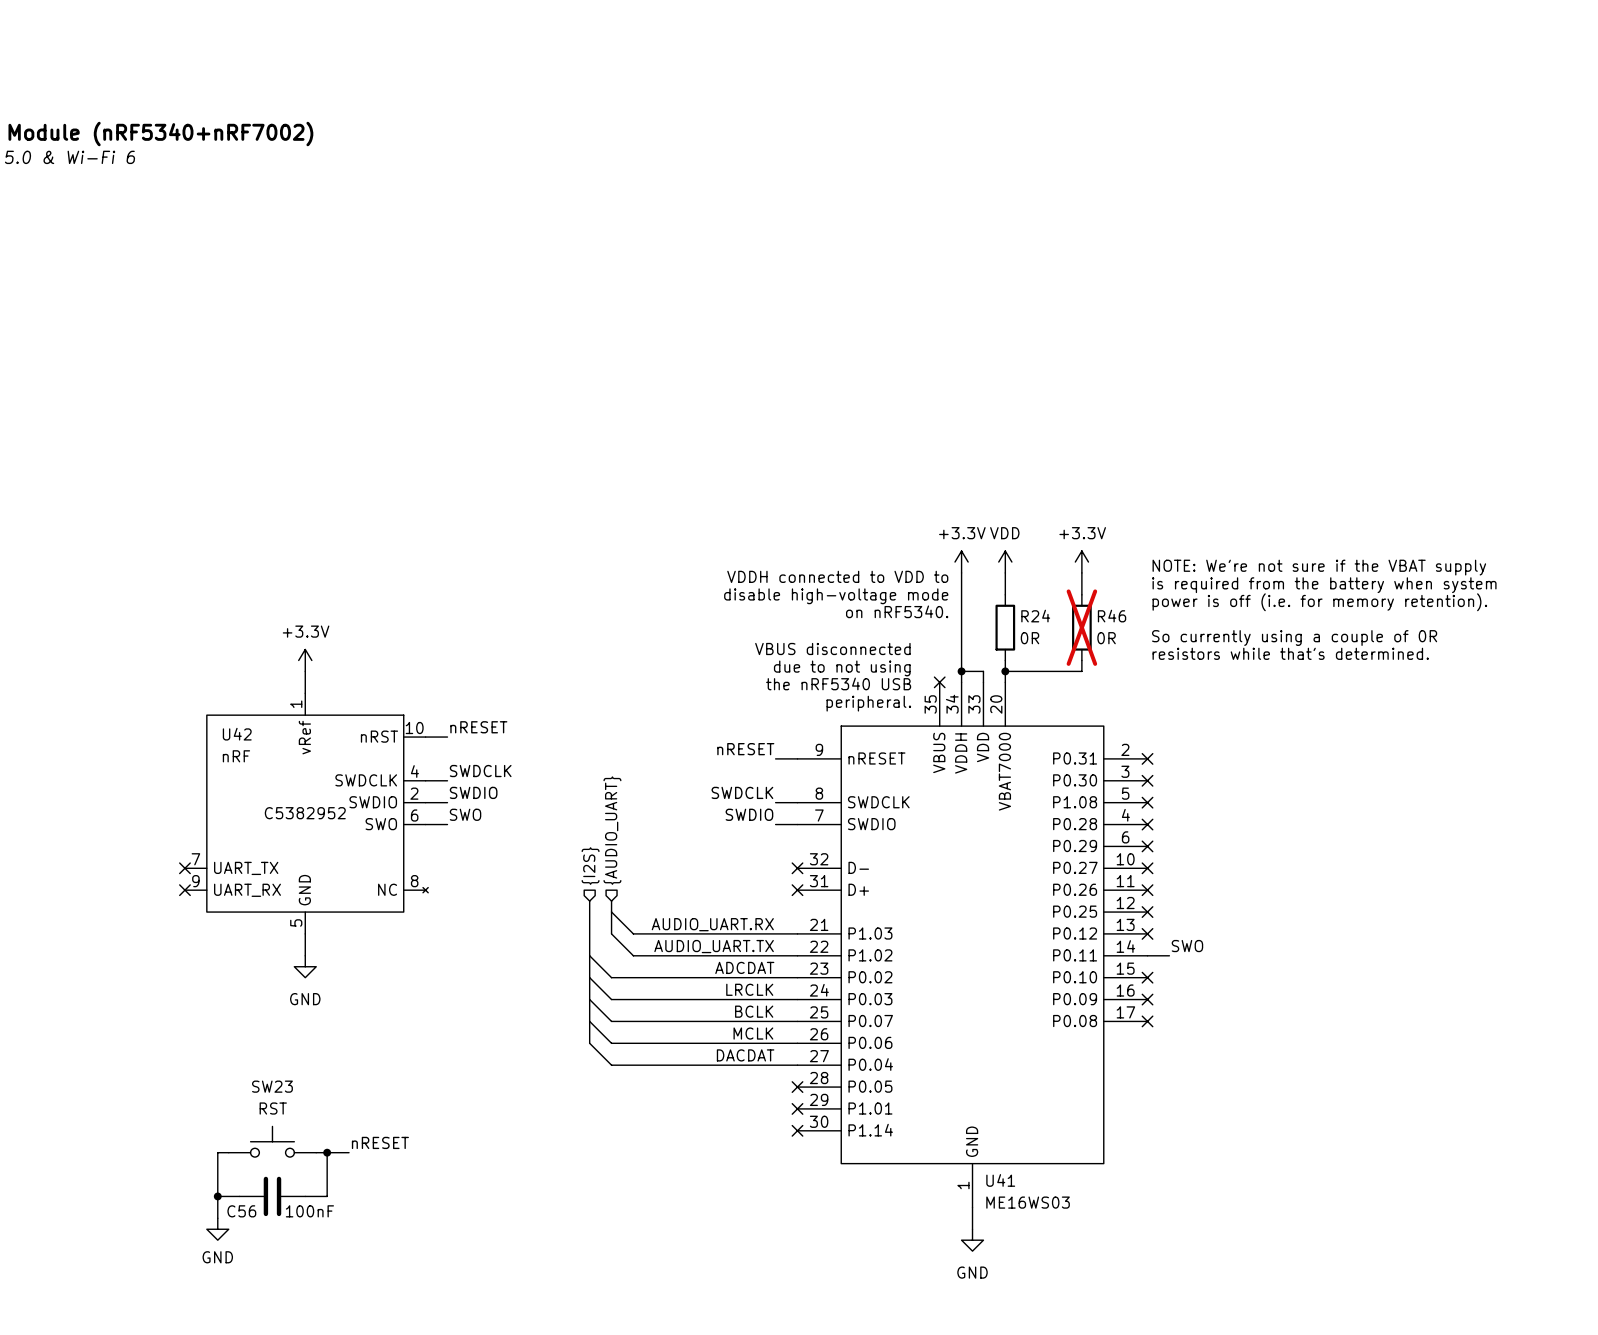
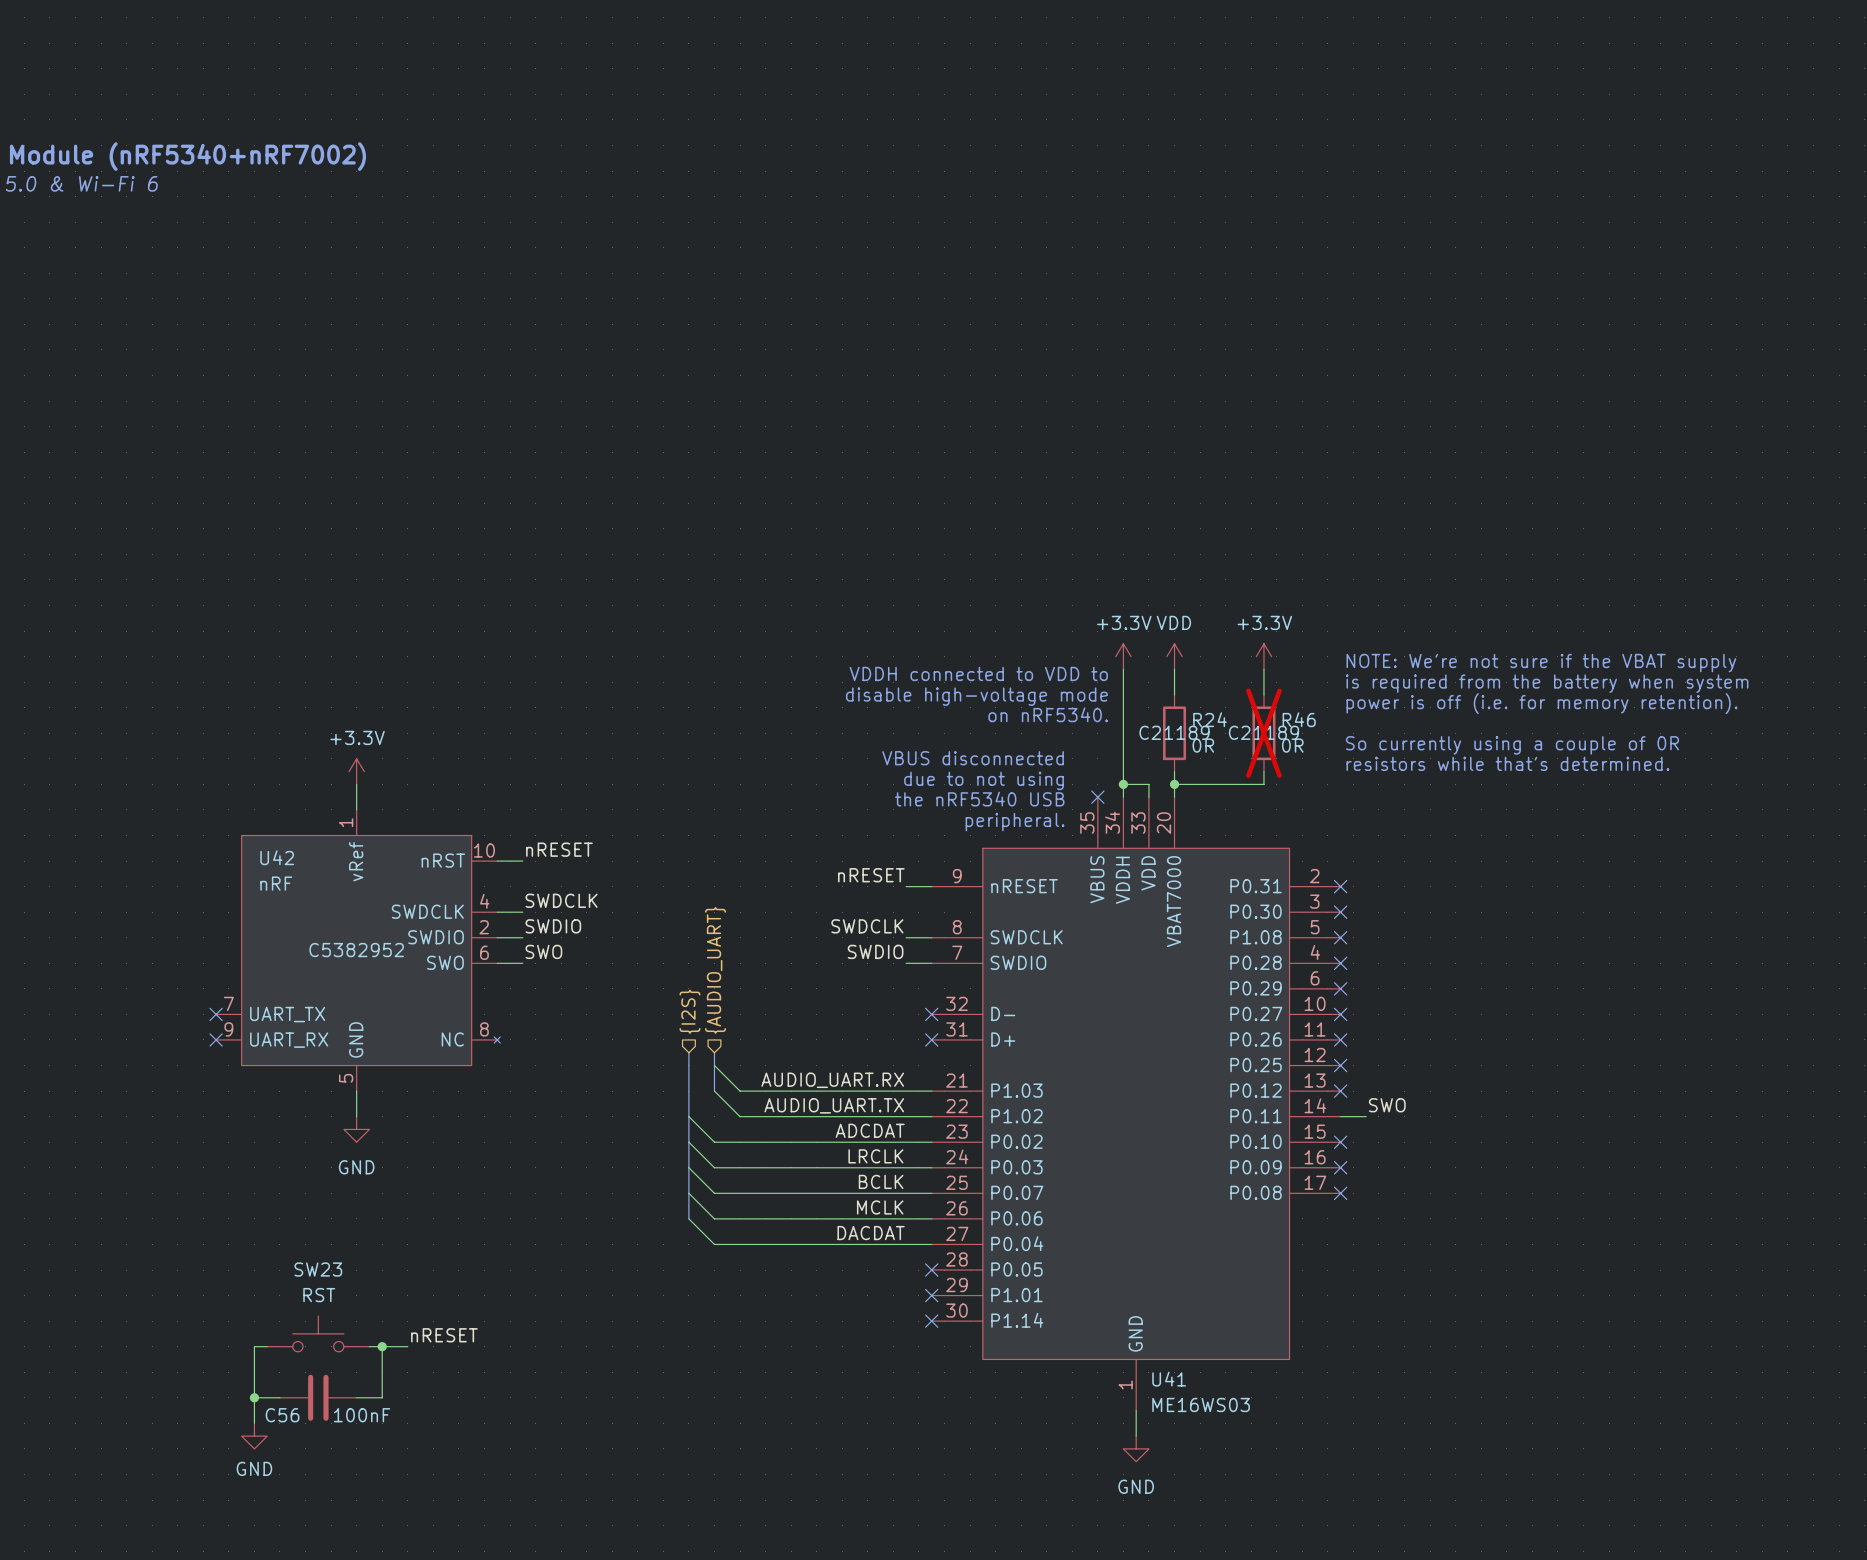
R24 text: none -> C21189 (1174, 732)
R46 text: none -> C21189 (1263, 732)

